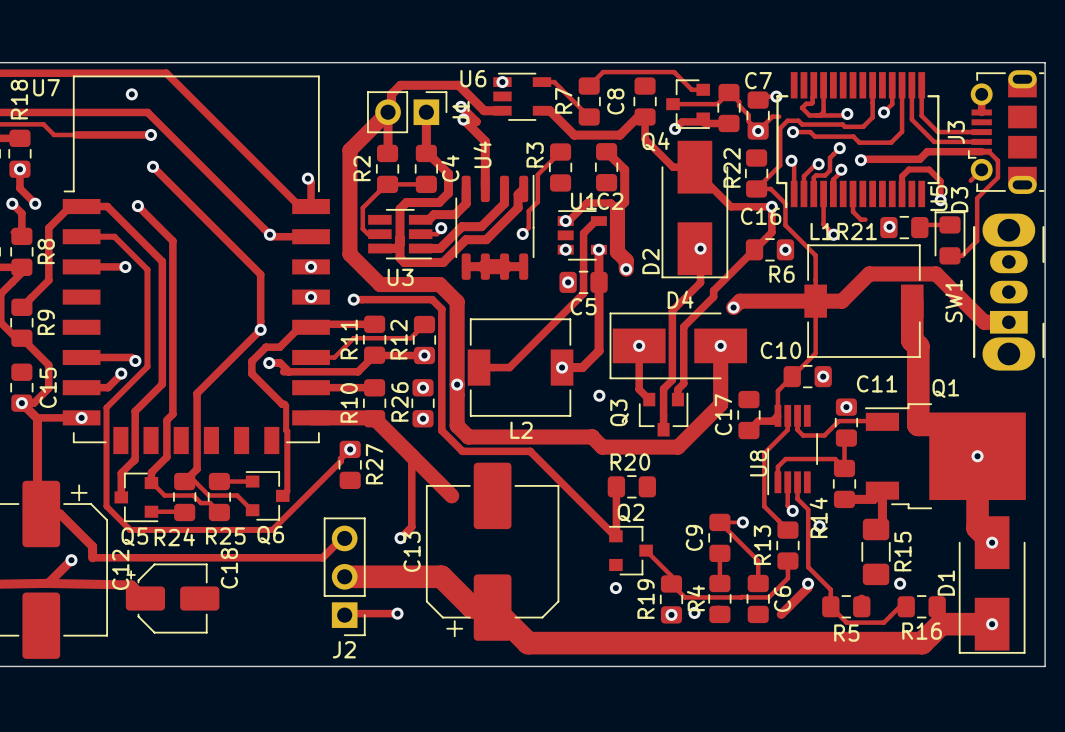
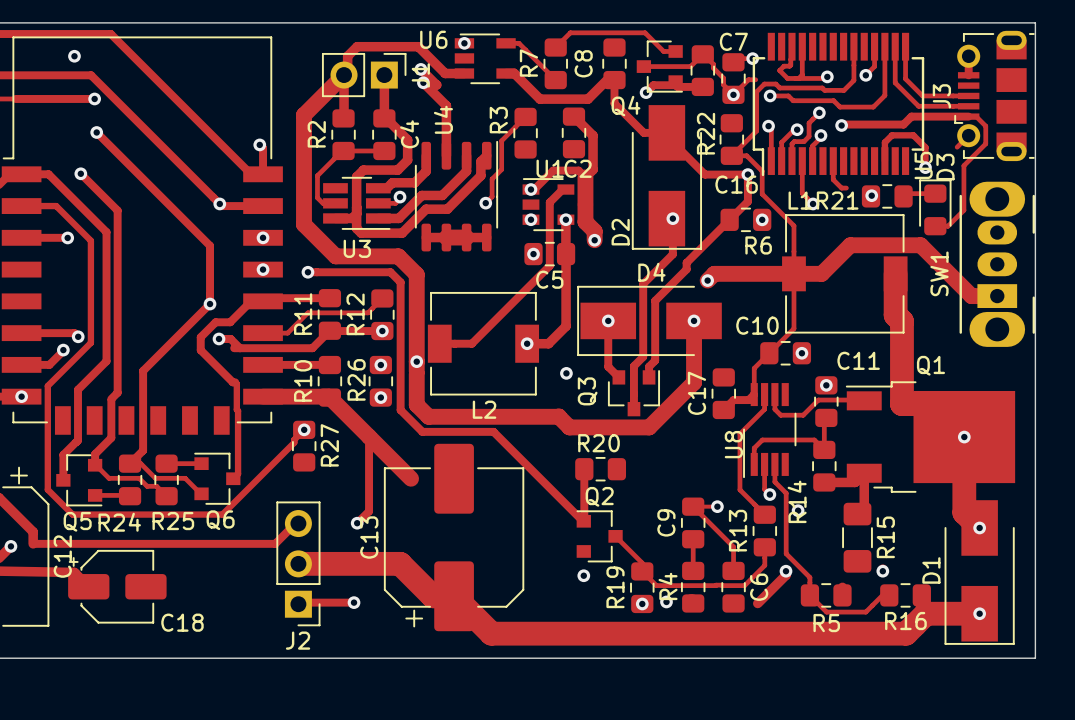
C18 name rotation: 0° (229, 568) -> 90° clockwise (182, 622)
C18 name position: C18 (229, 568) -> C18 (182, 622)

